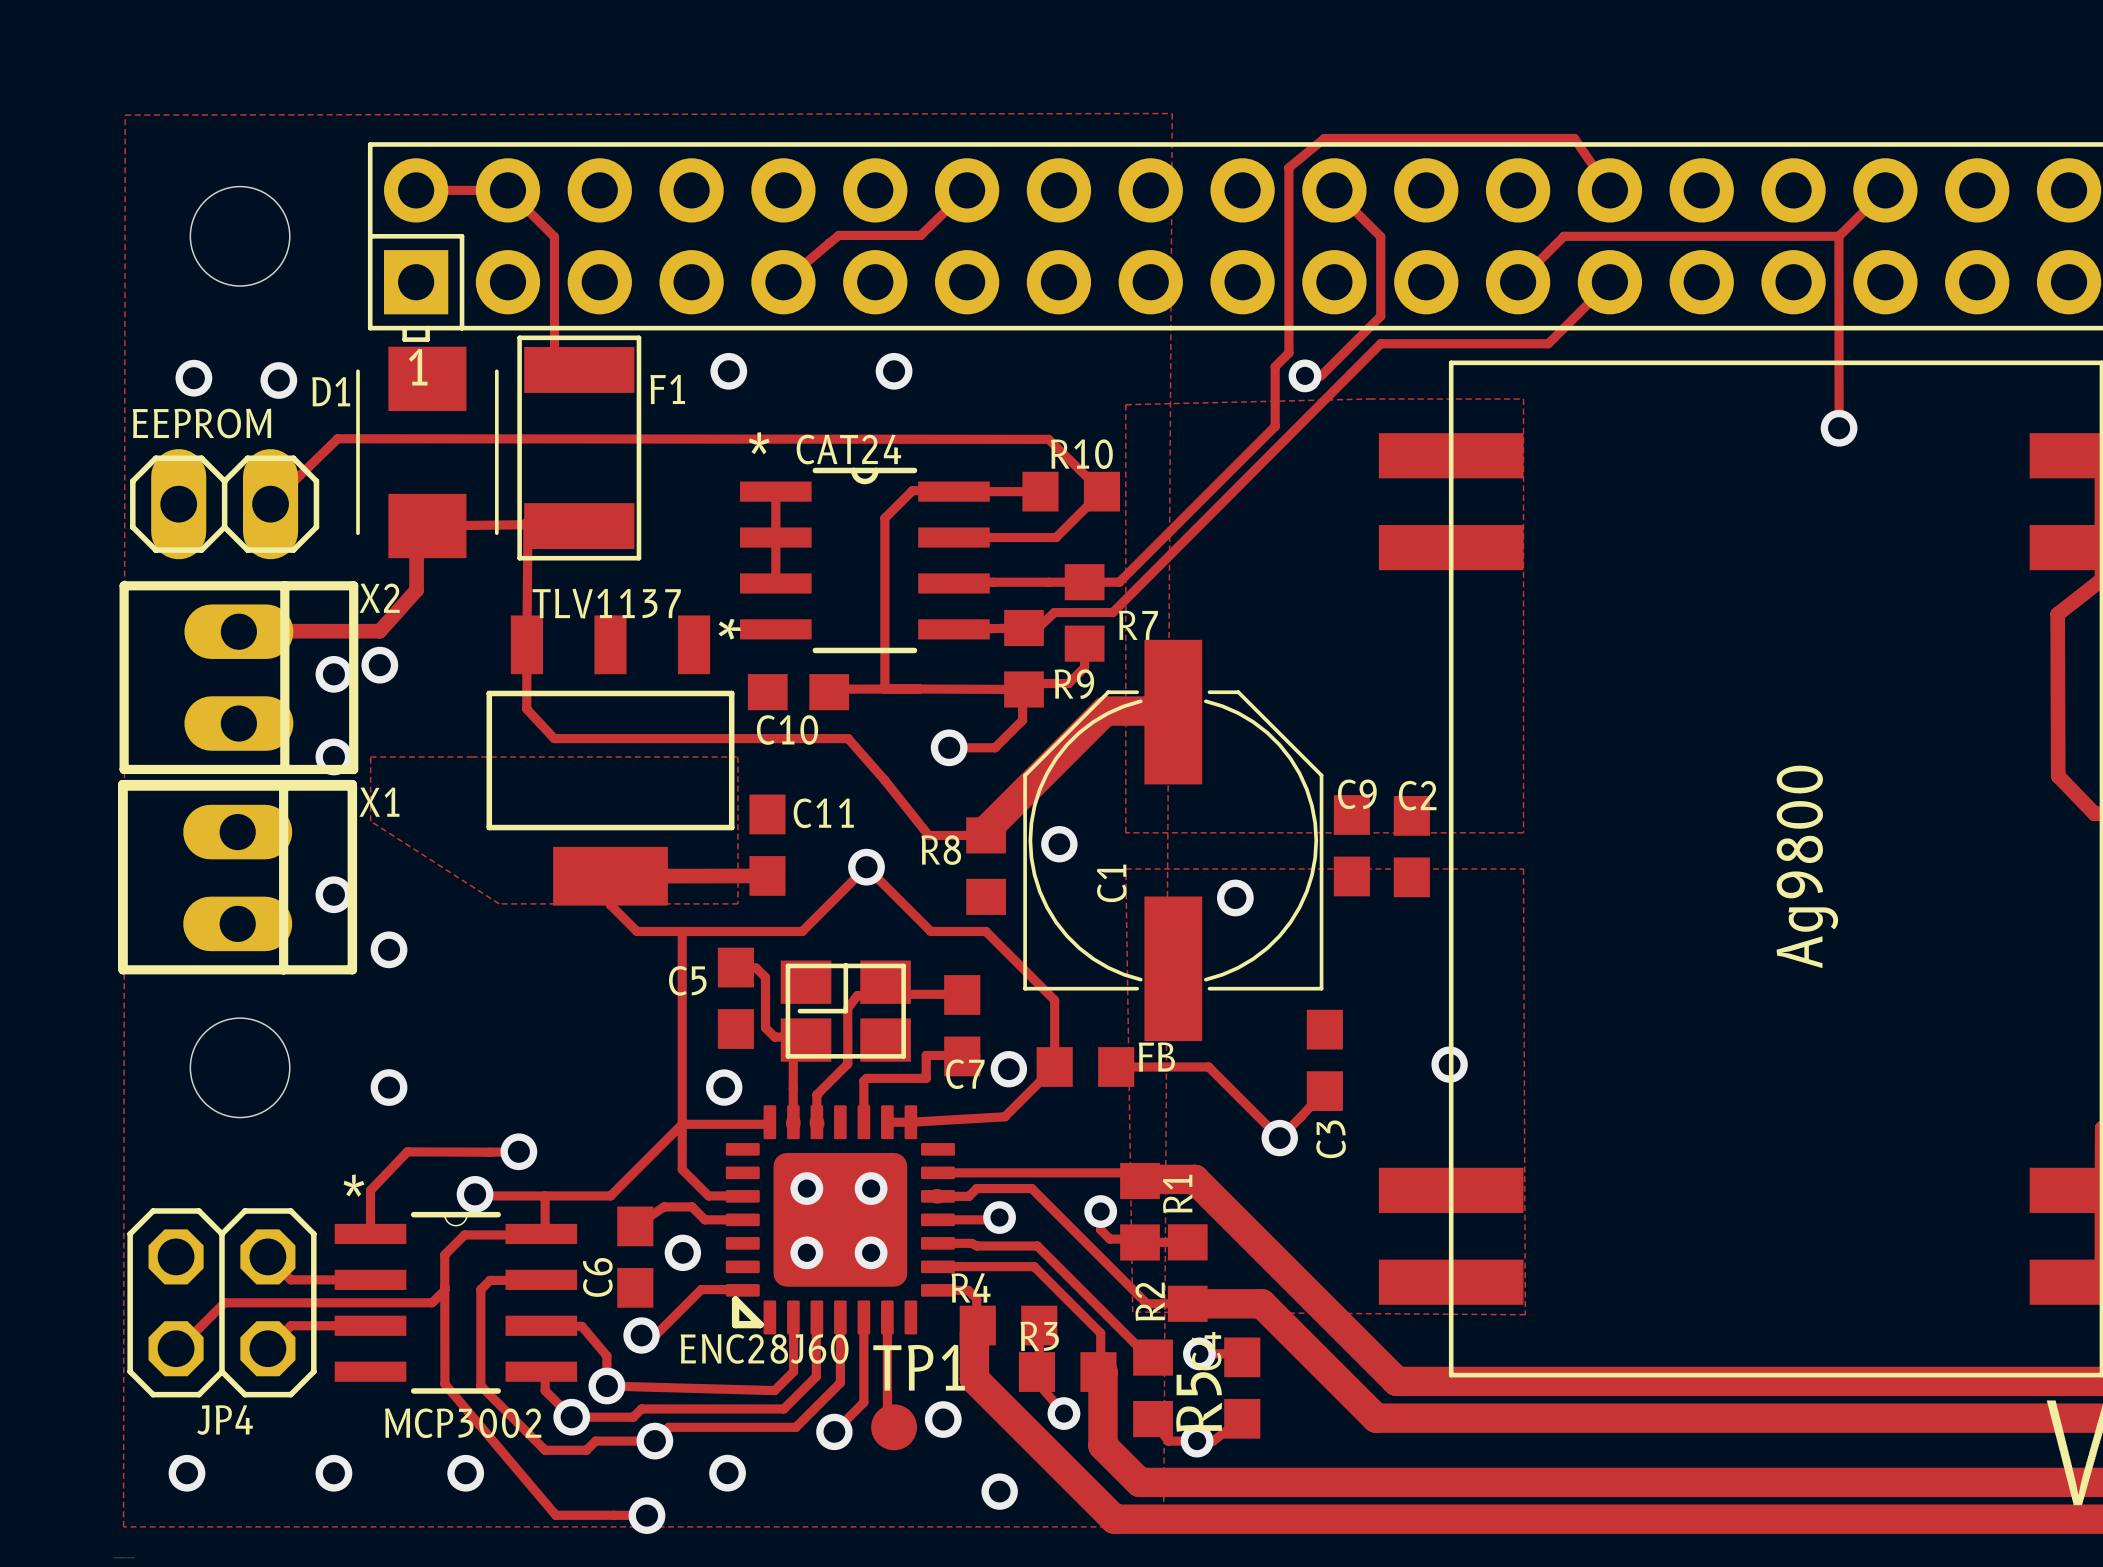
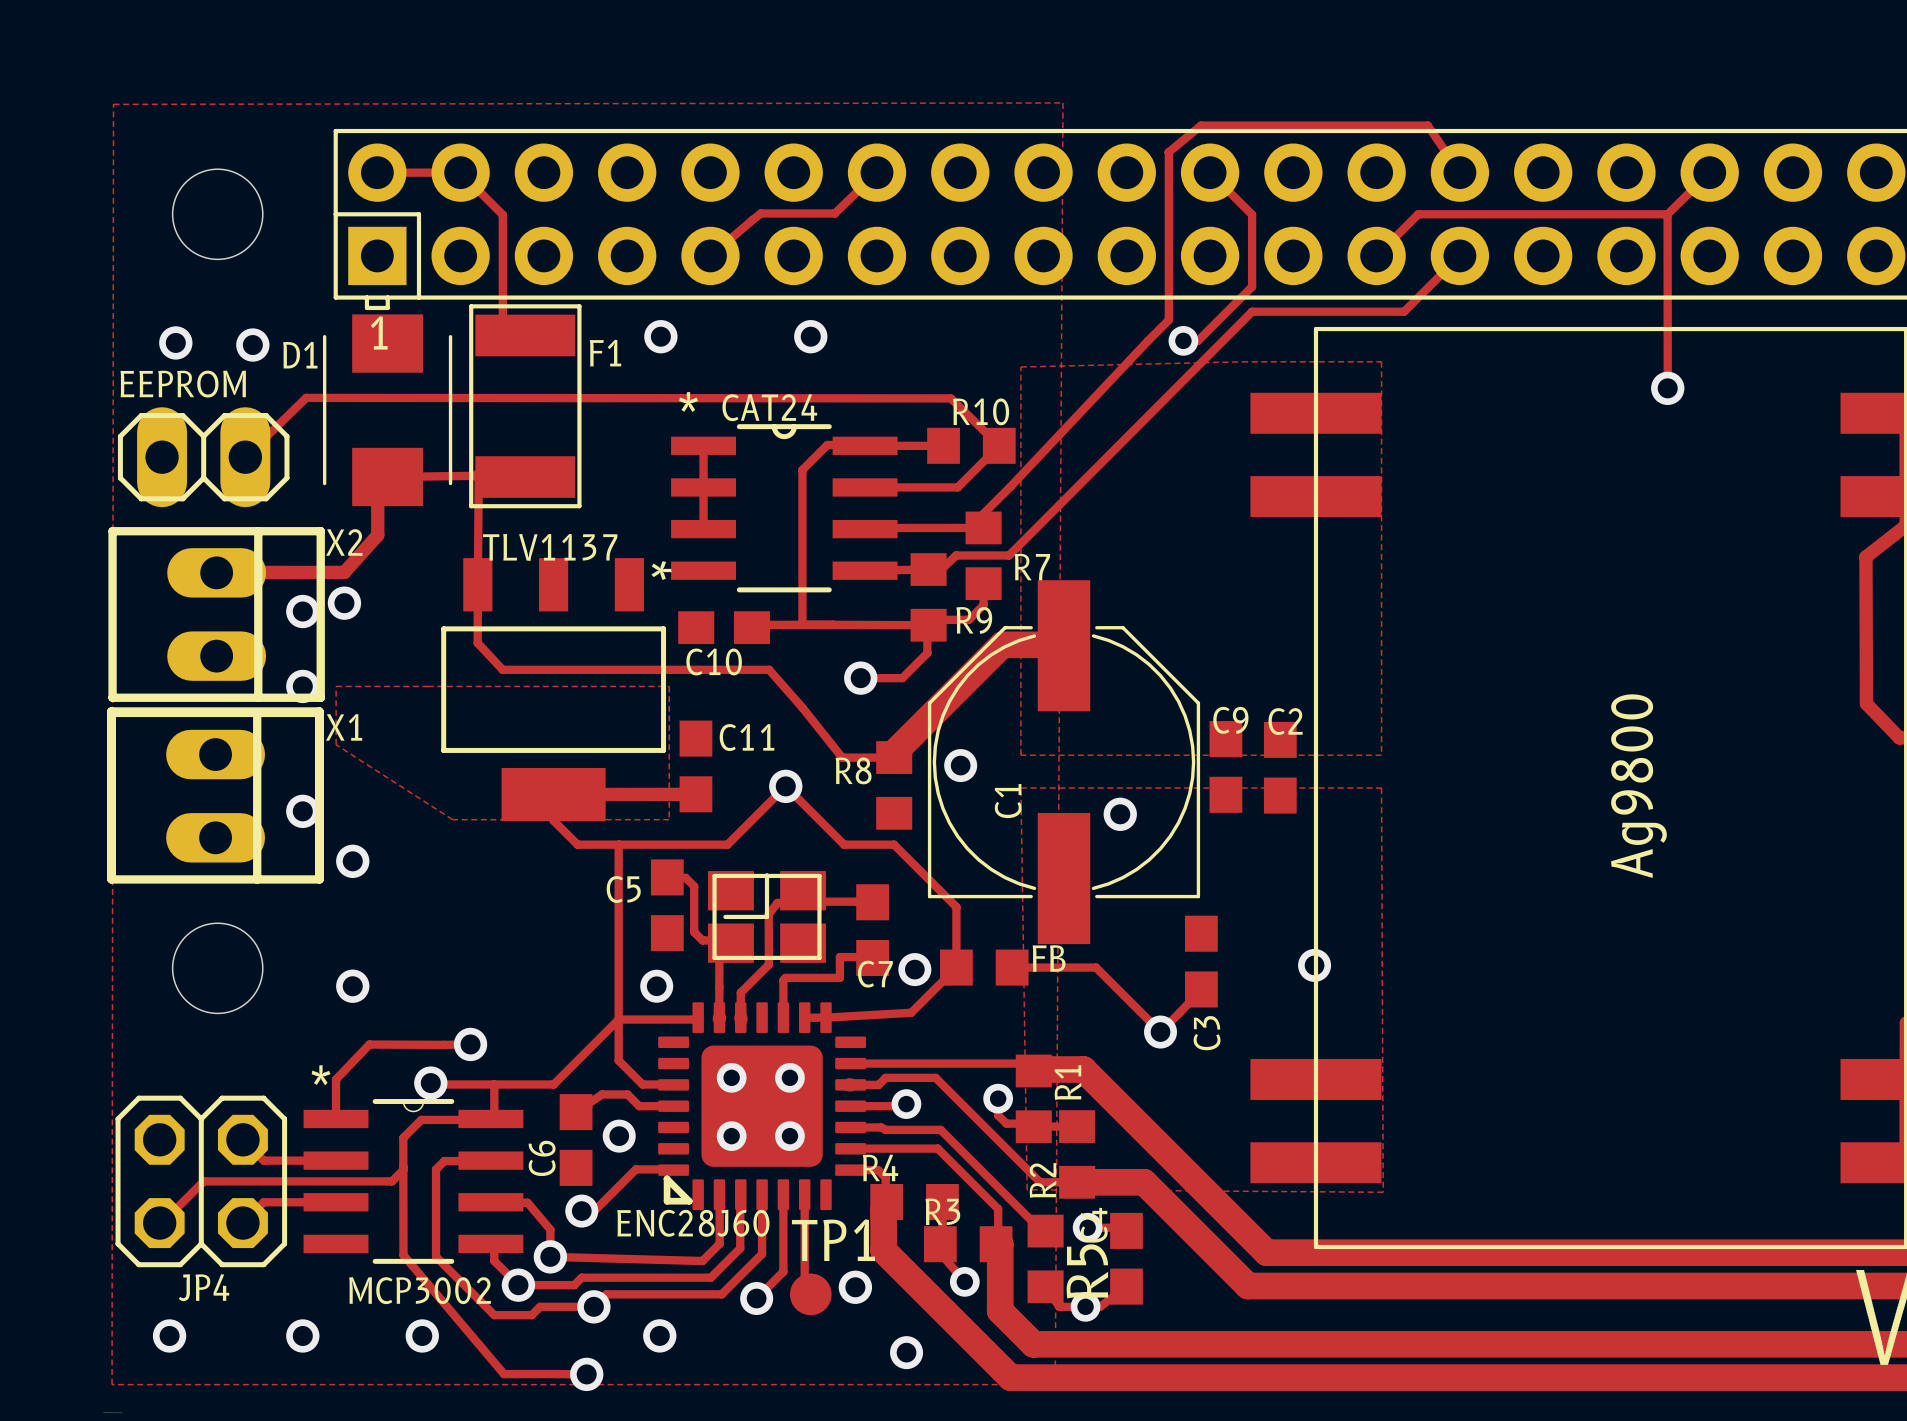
track: (1275, 366) (1275, 426) (1119, 582) (1084, 582) -> (1156, 332) (983, 513) (983, 527)

